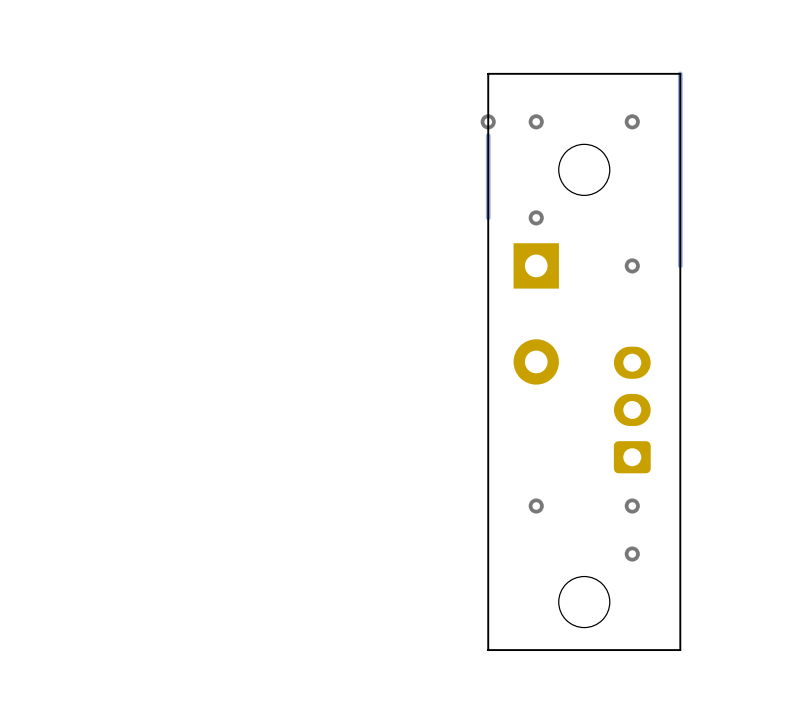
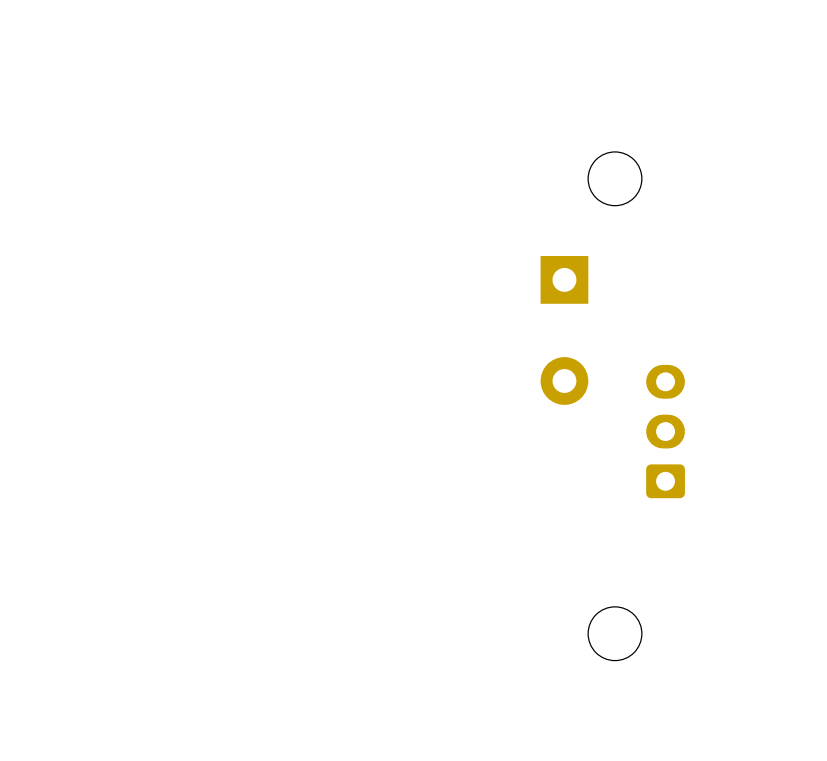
board edge: (680, 73) (488, 73) (488, 650) (680, 650) (680, 73) -> none
track: (680, 73) (680, 265) -> none
via: (488, 121) -> none
via: (536, 121) -> none
via: (632, 121) -> none
track: (488, 135) (488, 217) -> none
via: (536, 217) -> none
via: (632, 265) -> none
via: (536, 506) -> none
via: (632, 506) -> none
via: (632, 554) -> none

